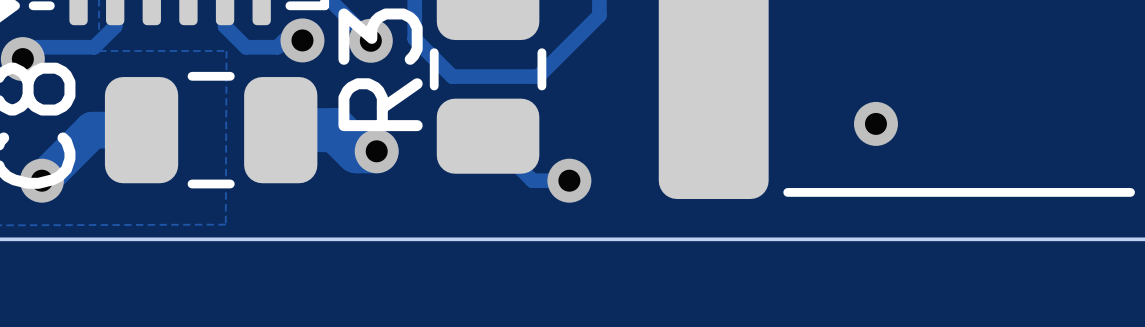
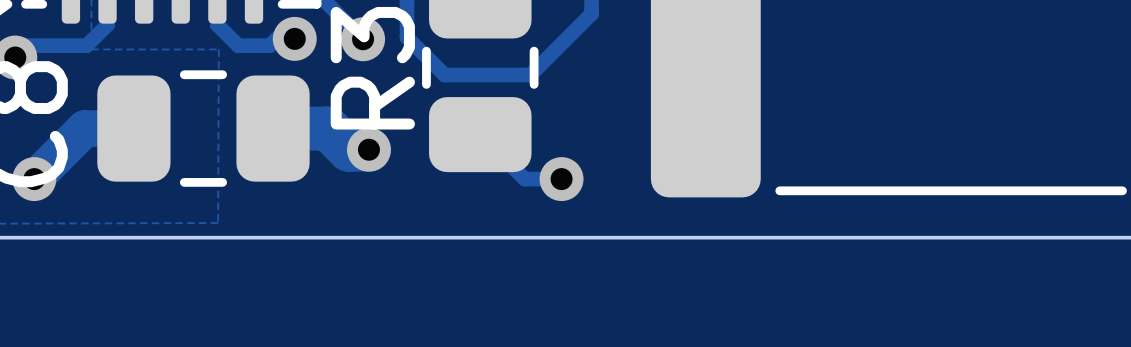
via: (875, 123) -> none

